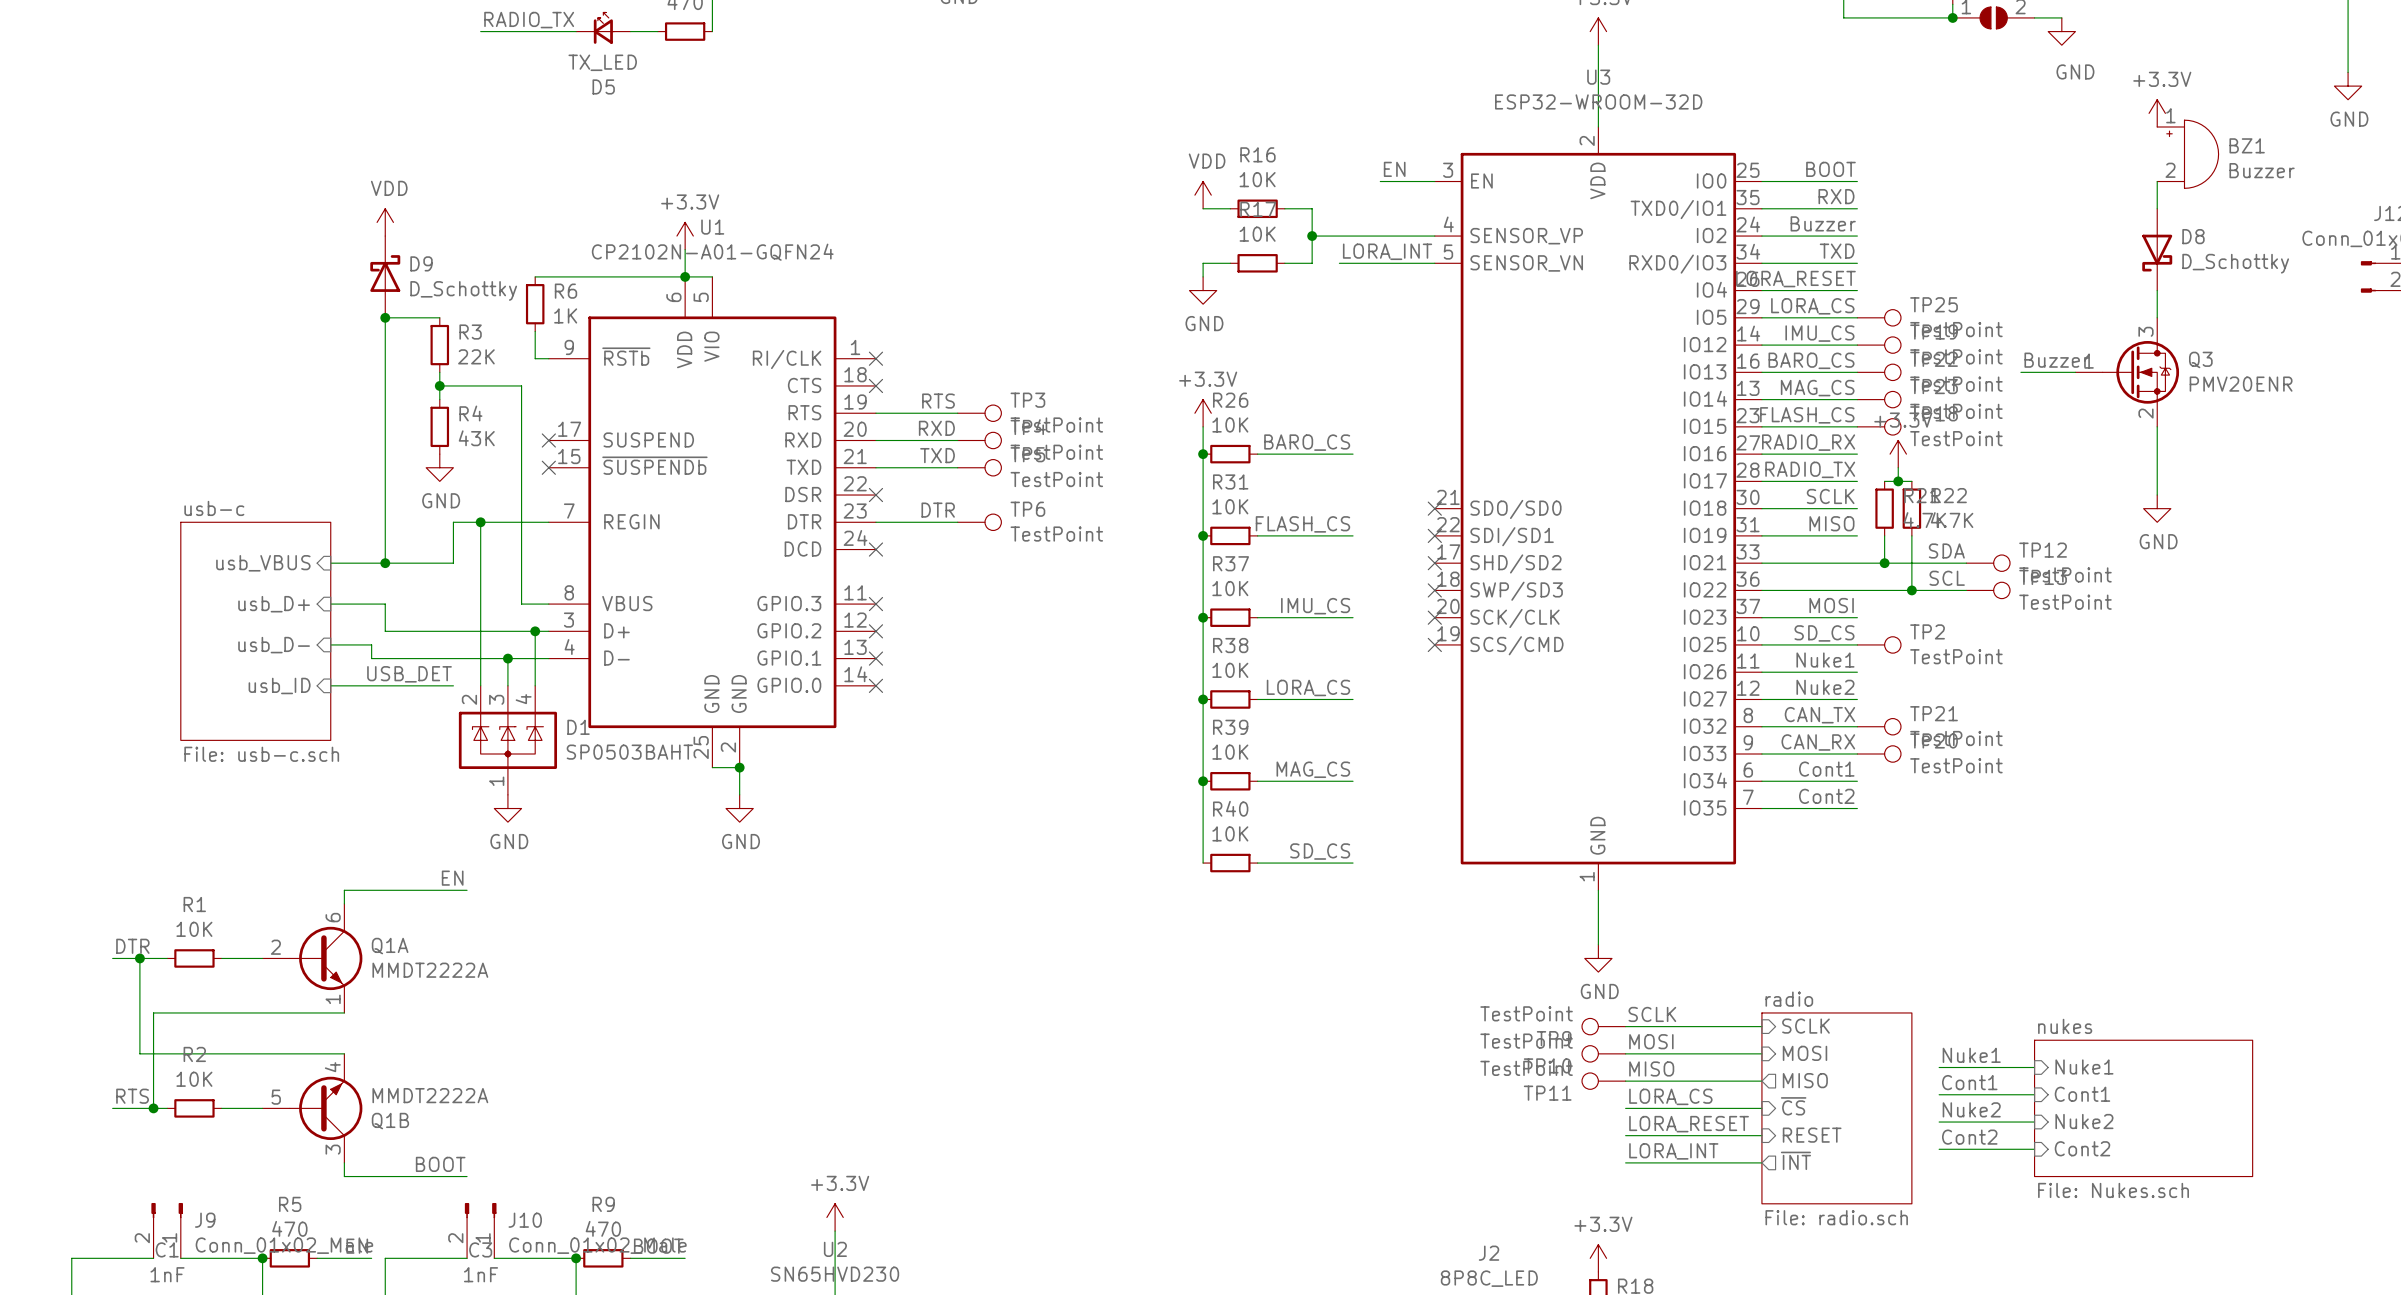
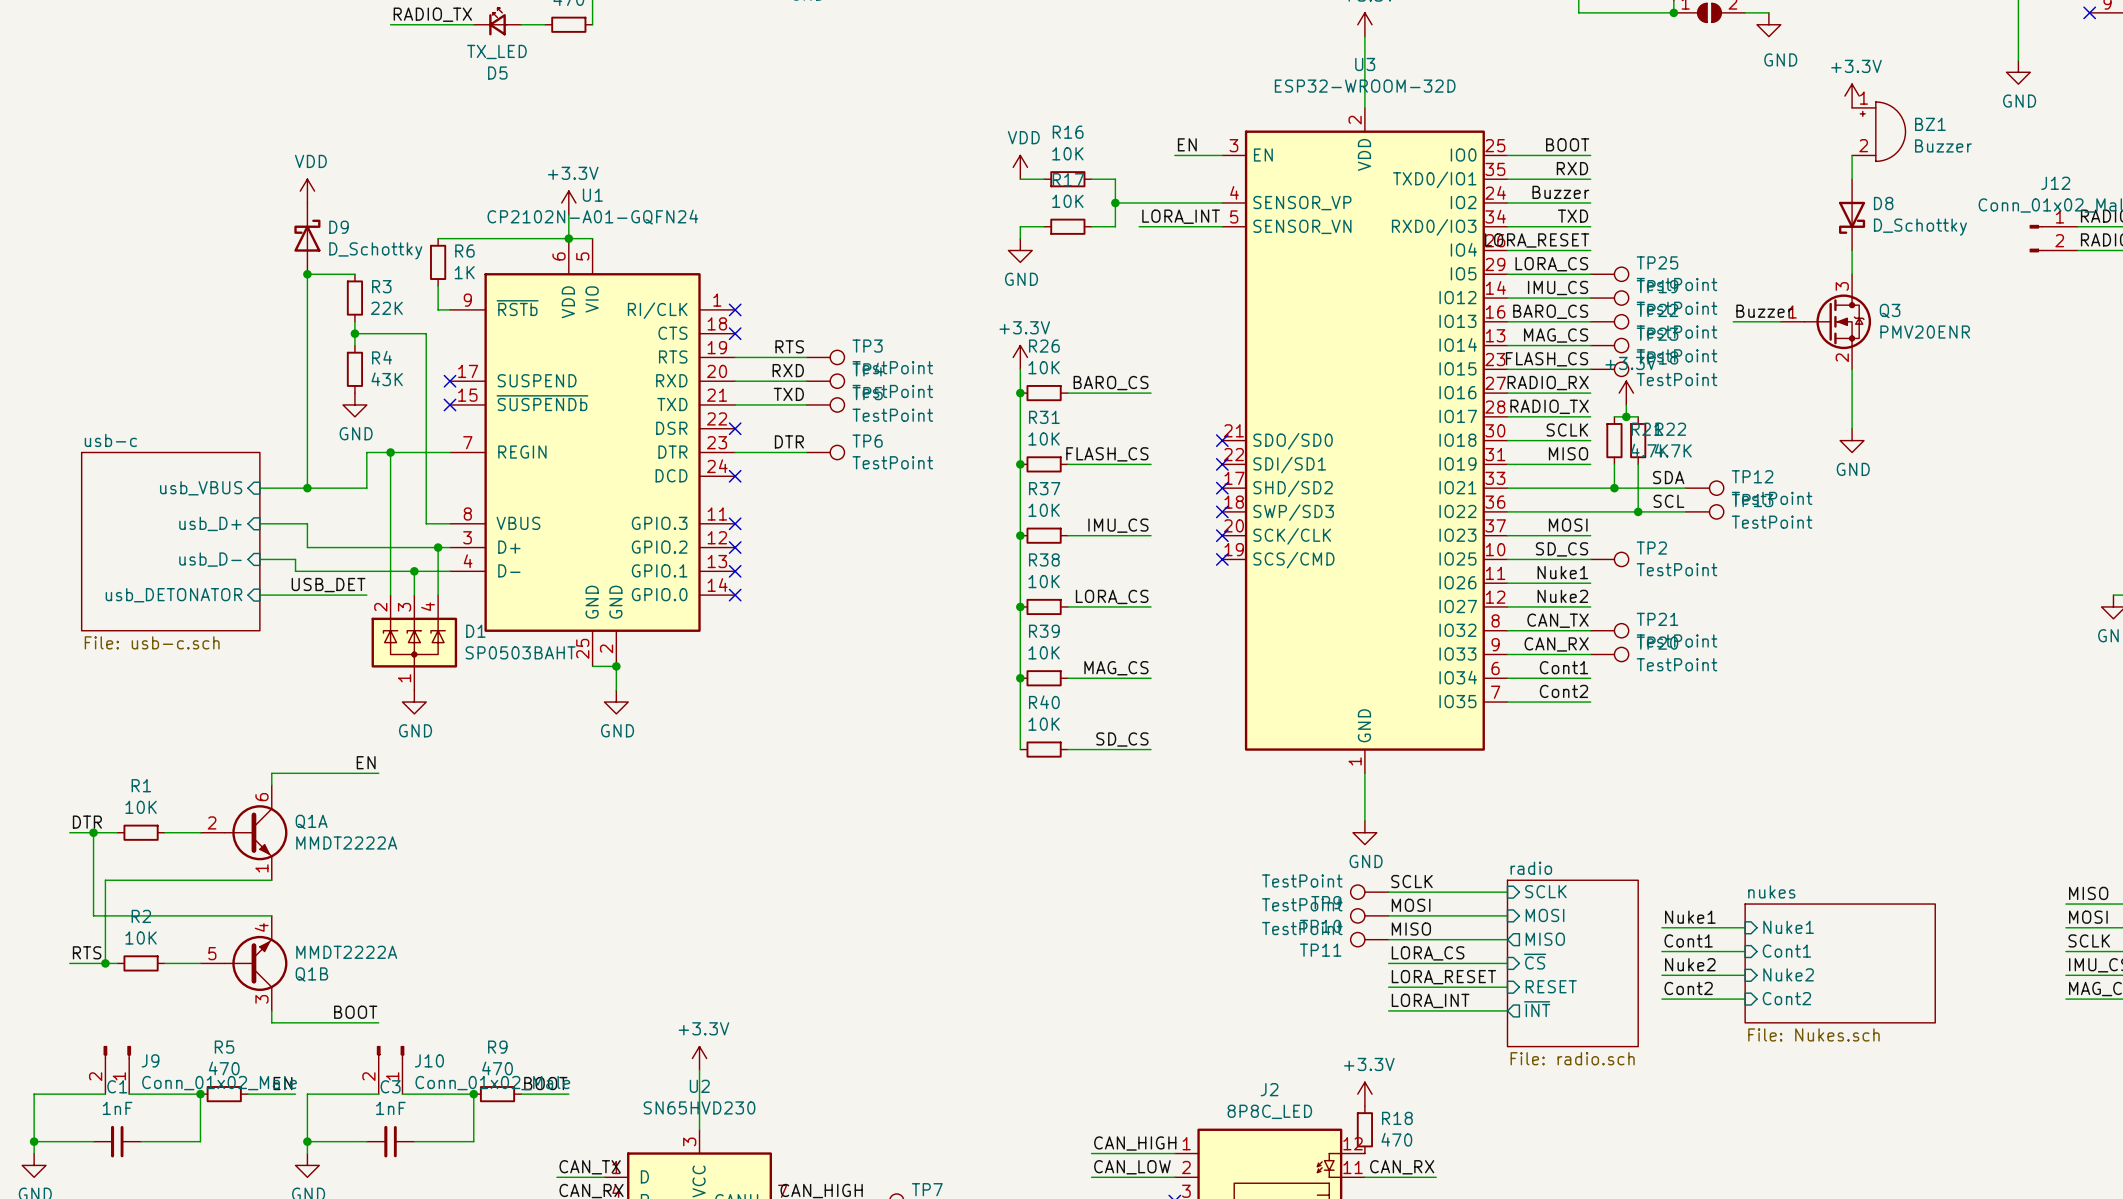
sheet usb-c: none -> File: usb-c.sch (170, 541)
sheet usb-c: File: usb-c.sch (255, 631) -> none
sheet pin: usb_ID (279, 685) -> usb_DETONATOR (173, 595)

